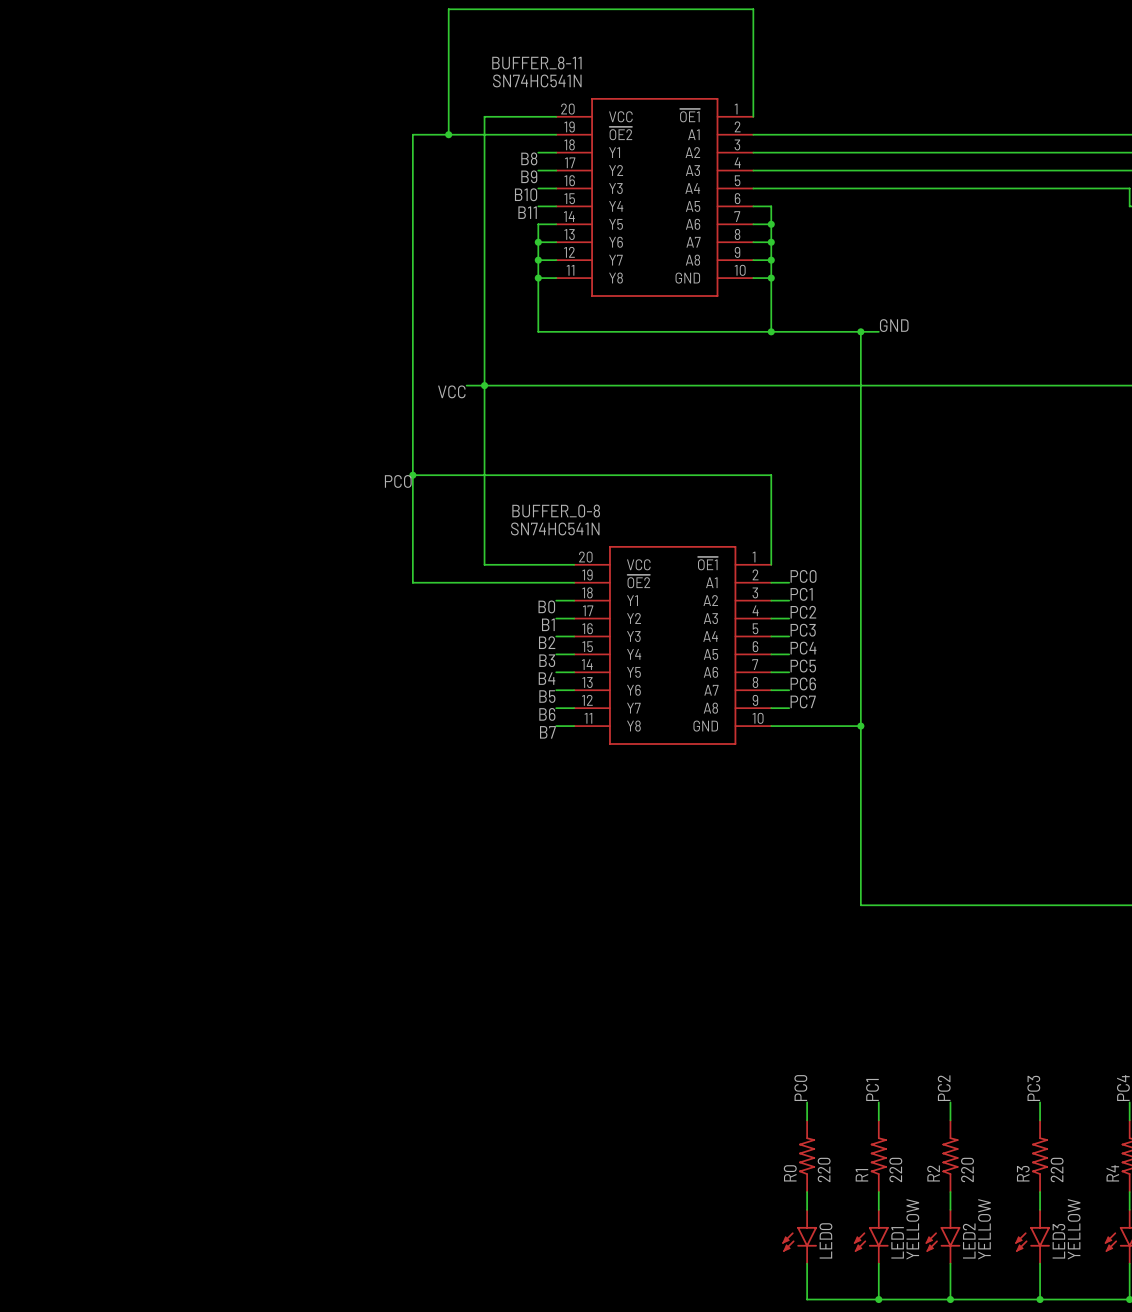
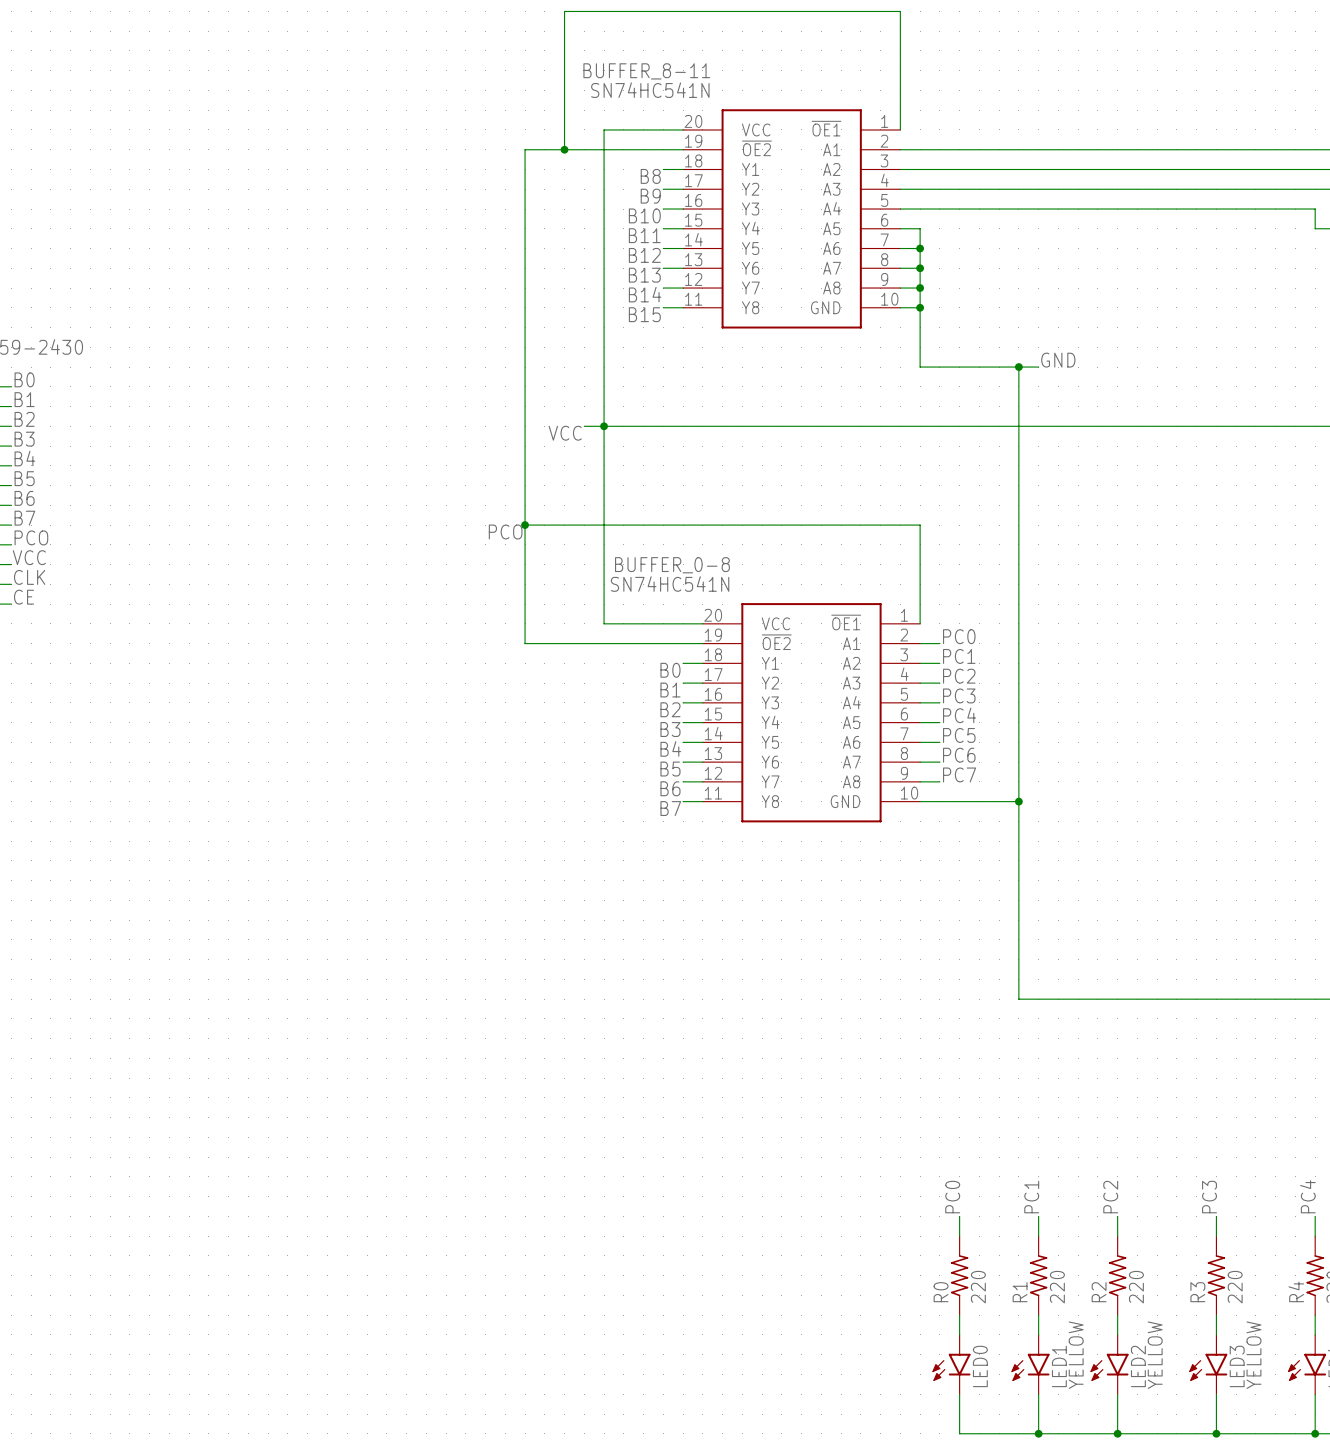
wire: (538, 224) (538, 331) (771, 331) -> none
label: none -> B12 (644, 255)
junction: (538, 242) -> none
label: none -> B13 (644, 275)
junction: (538, 260) -> none
label: none -> B14 (645, 294)
junction: (538, 278) -> none
label: none -> B15 (644, 314)
junction: (771, 331) -> none

